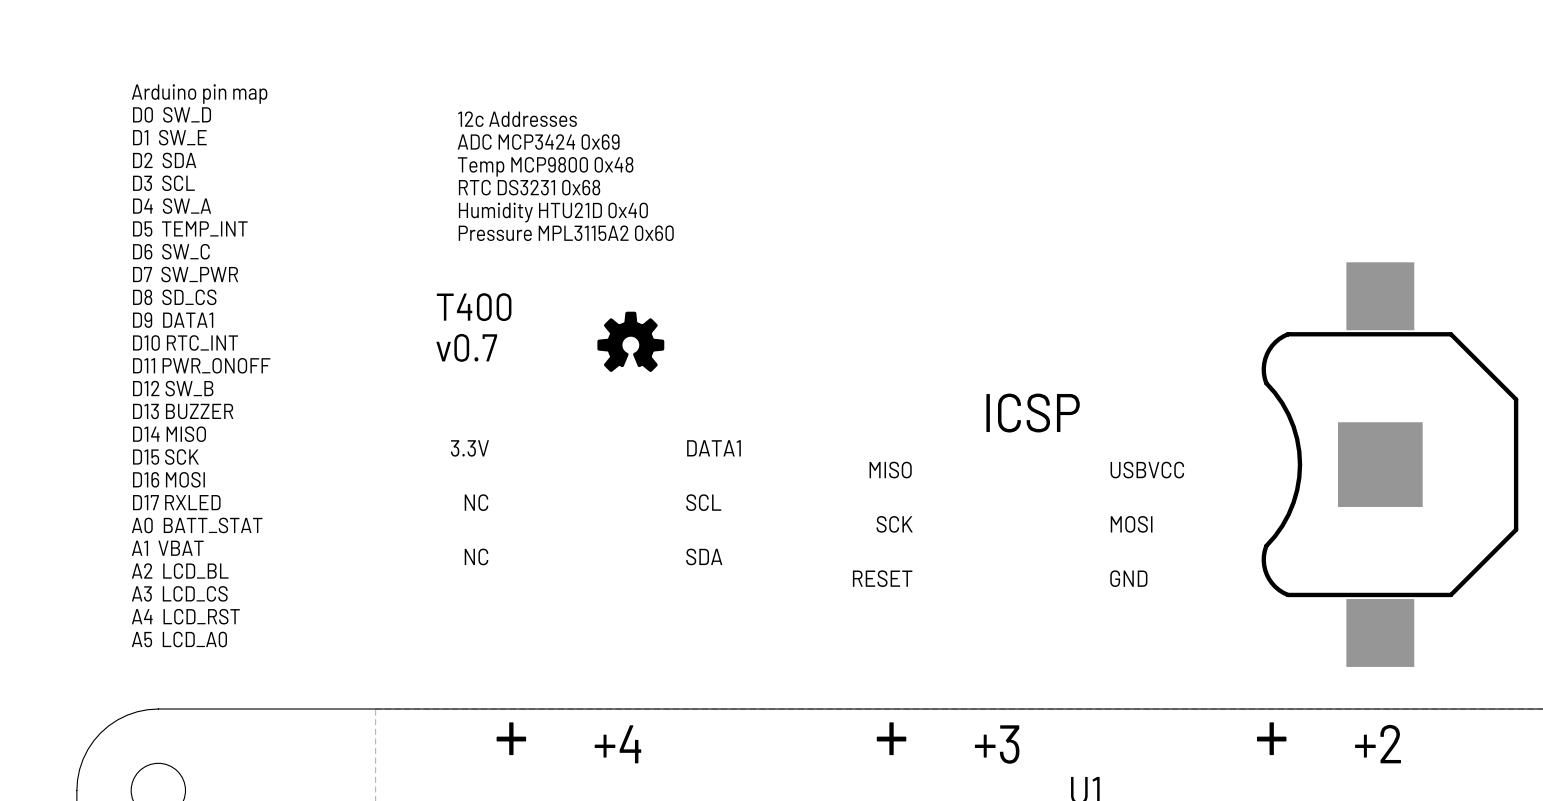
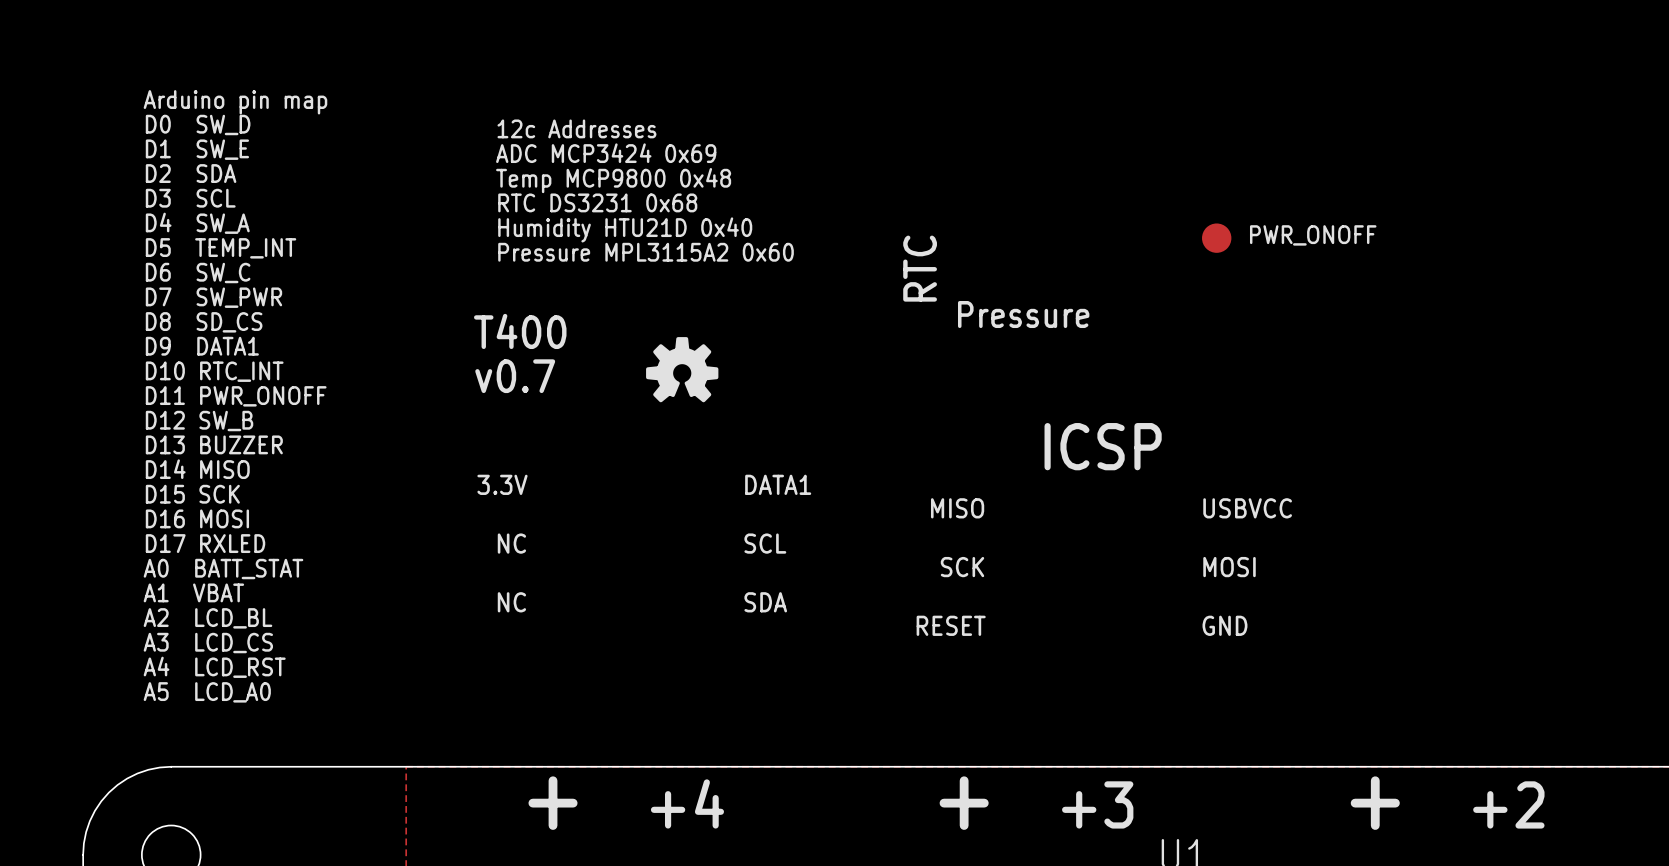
text: none -> PWR_ONOFF (1313, 235)
part: none -> (1216, 238)
text: none -> RTC (920, 268)
text: none -> Pressure (1023, 314)
part: (1389, 464) -> none

